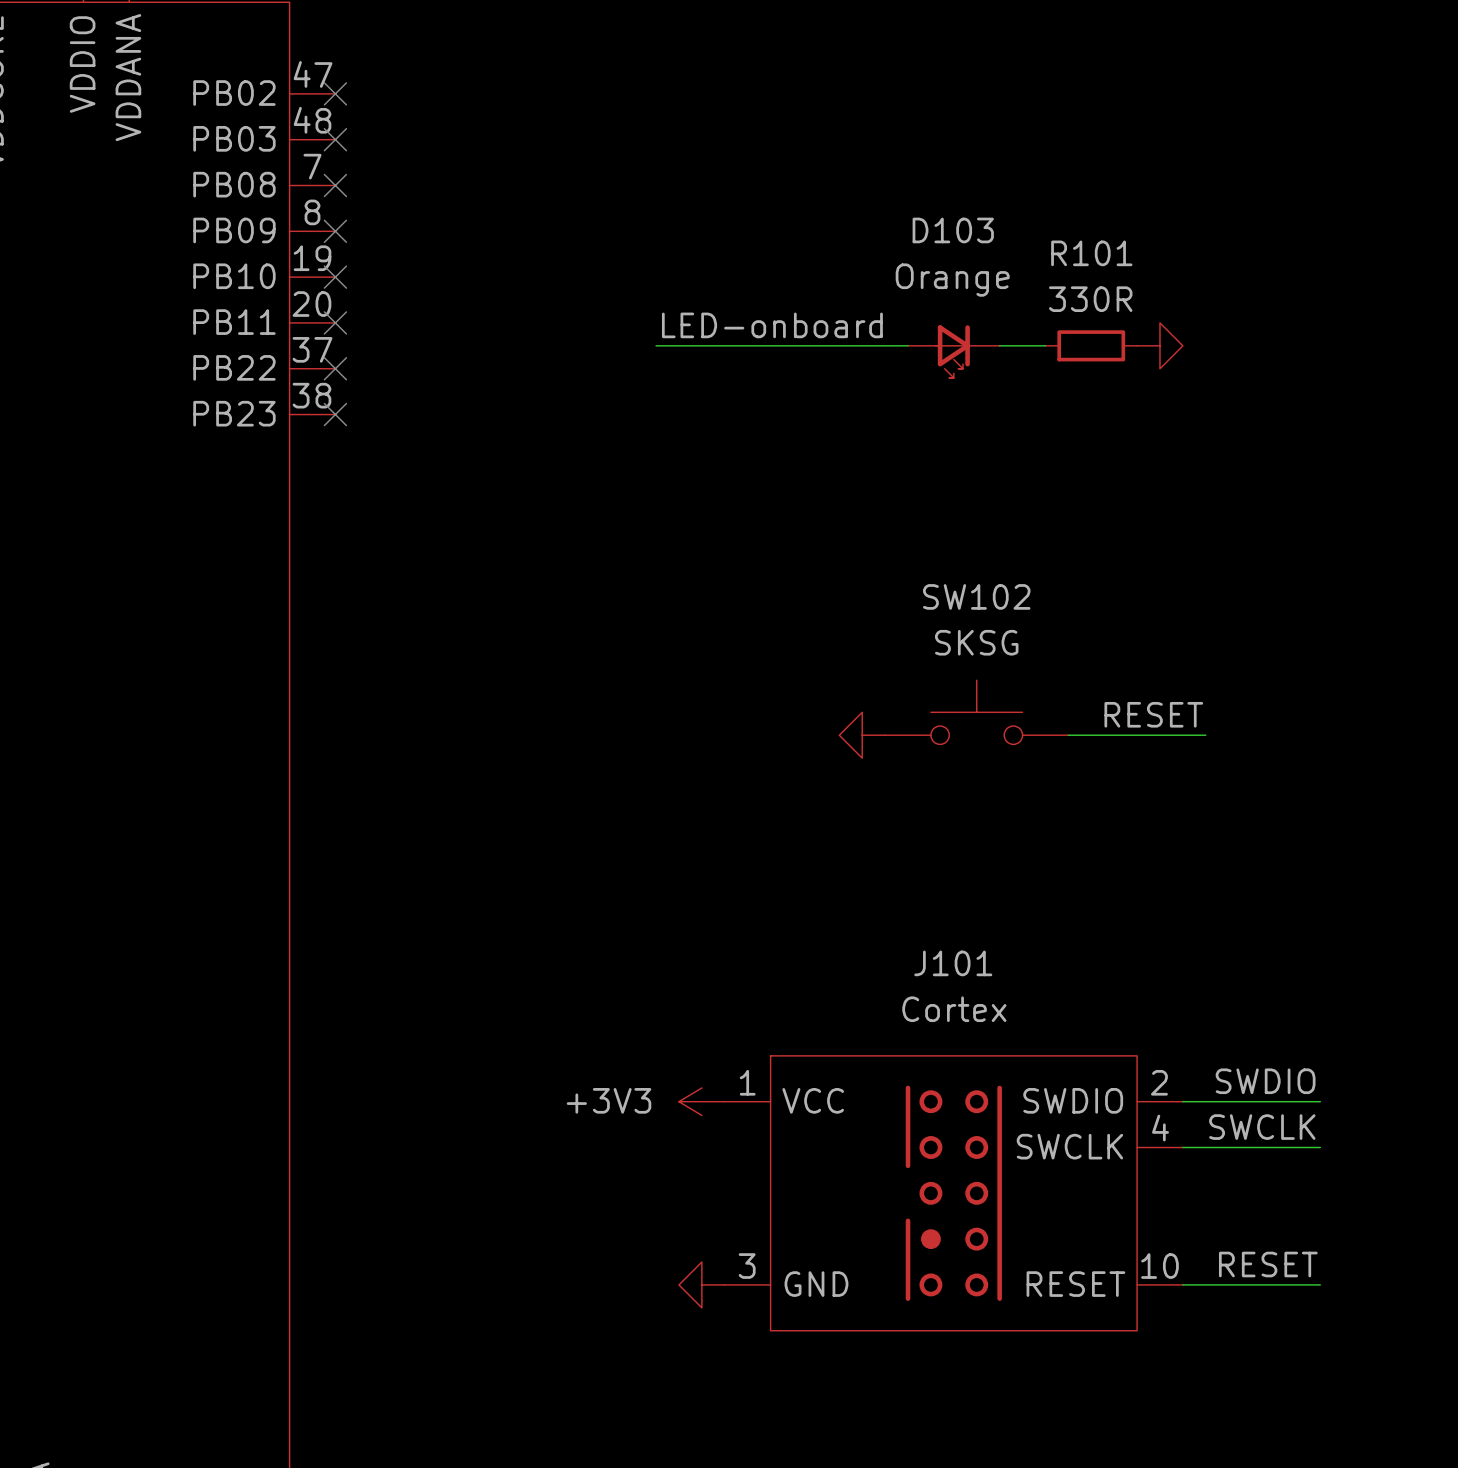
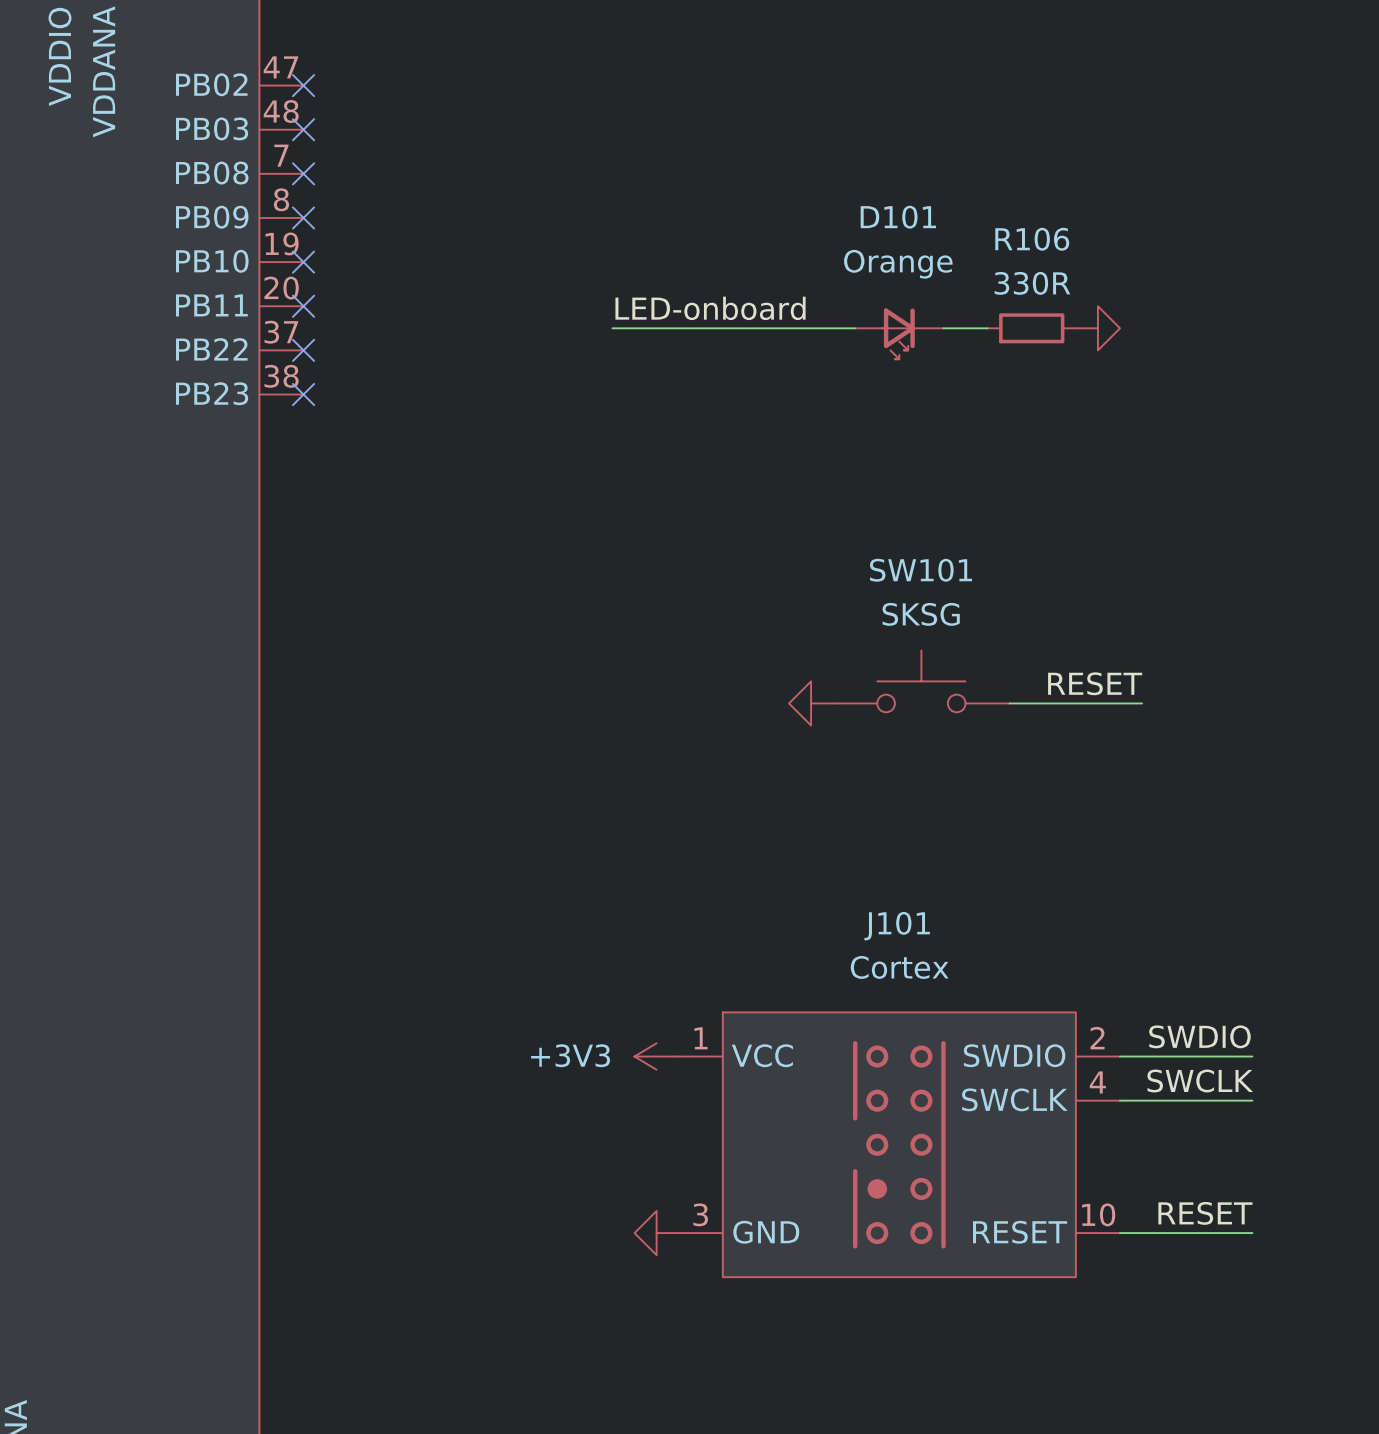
D103 name: D103 (953, 230) -> D101 (898, 217)
R101 name: R101 (1091, 253) -> R106 (1032, 239)
SW102 name: SW102 (976, 596) -> SW101 (921, 570)

